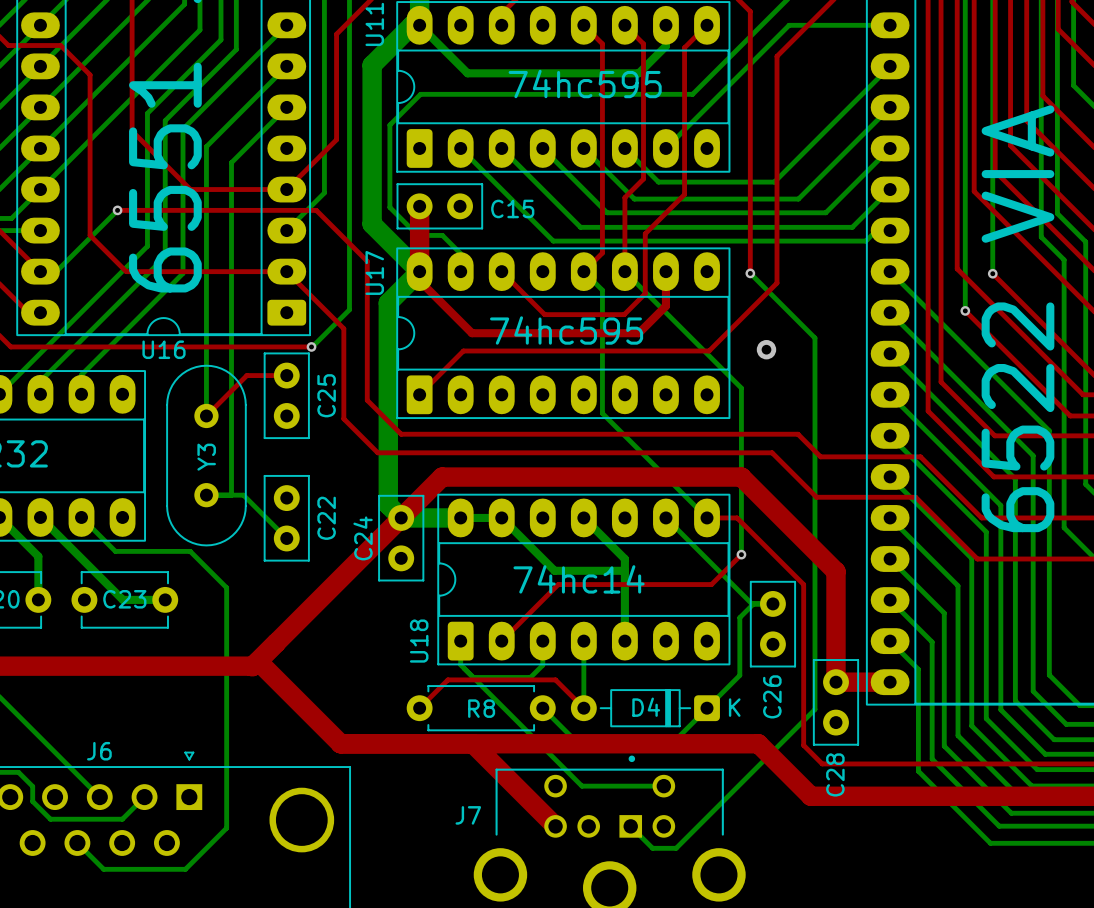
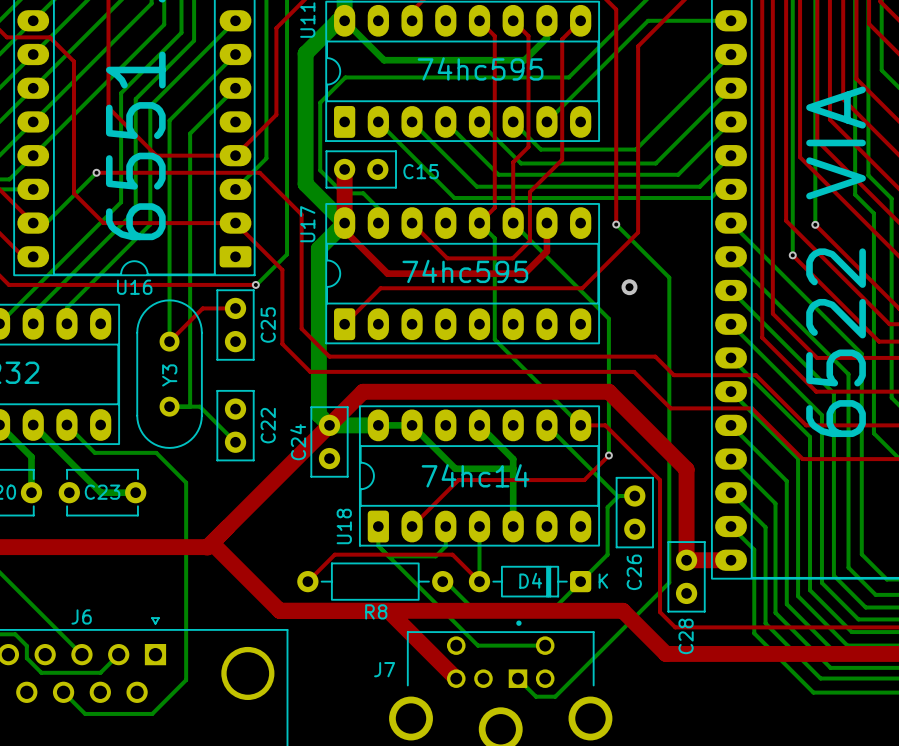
top track: (555, 679) (447, 679) (419, 708) -> (456, 558) (452, 554) (334, 554) (307, 581)
R8 footprint: [406, 685, 556, 732] -> [297, 562, 454, 601]
R8 name position: R8 (481, 708) -> R8 (376, 611)

